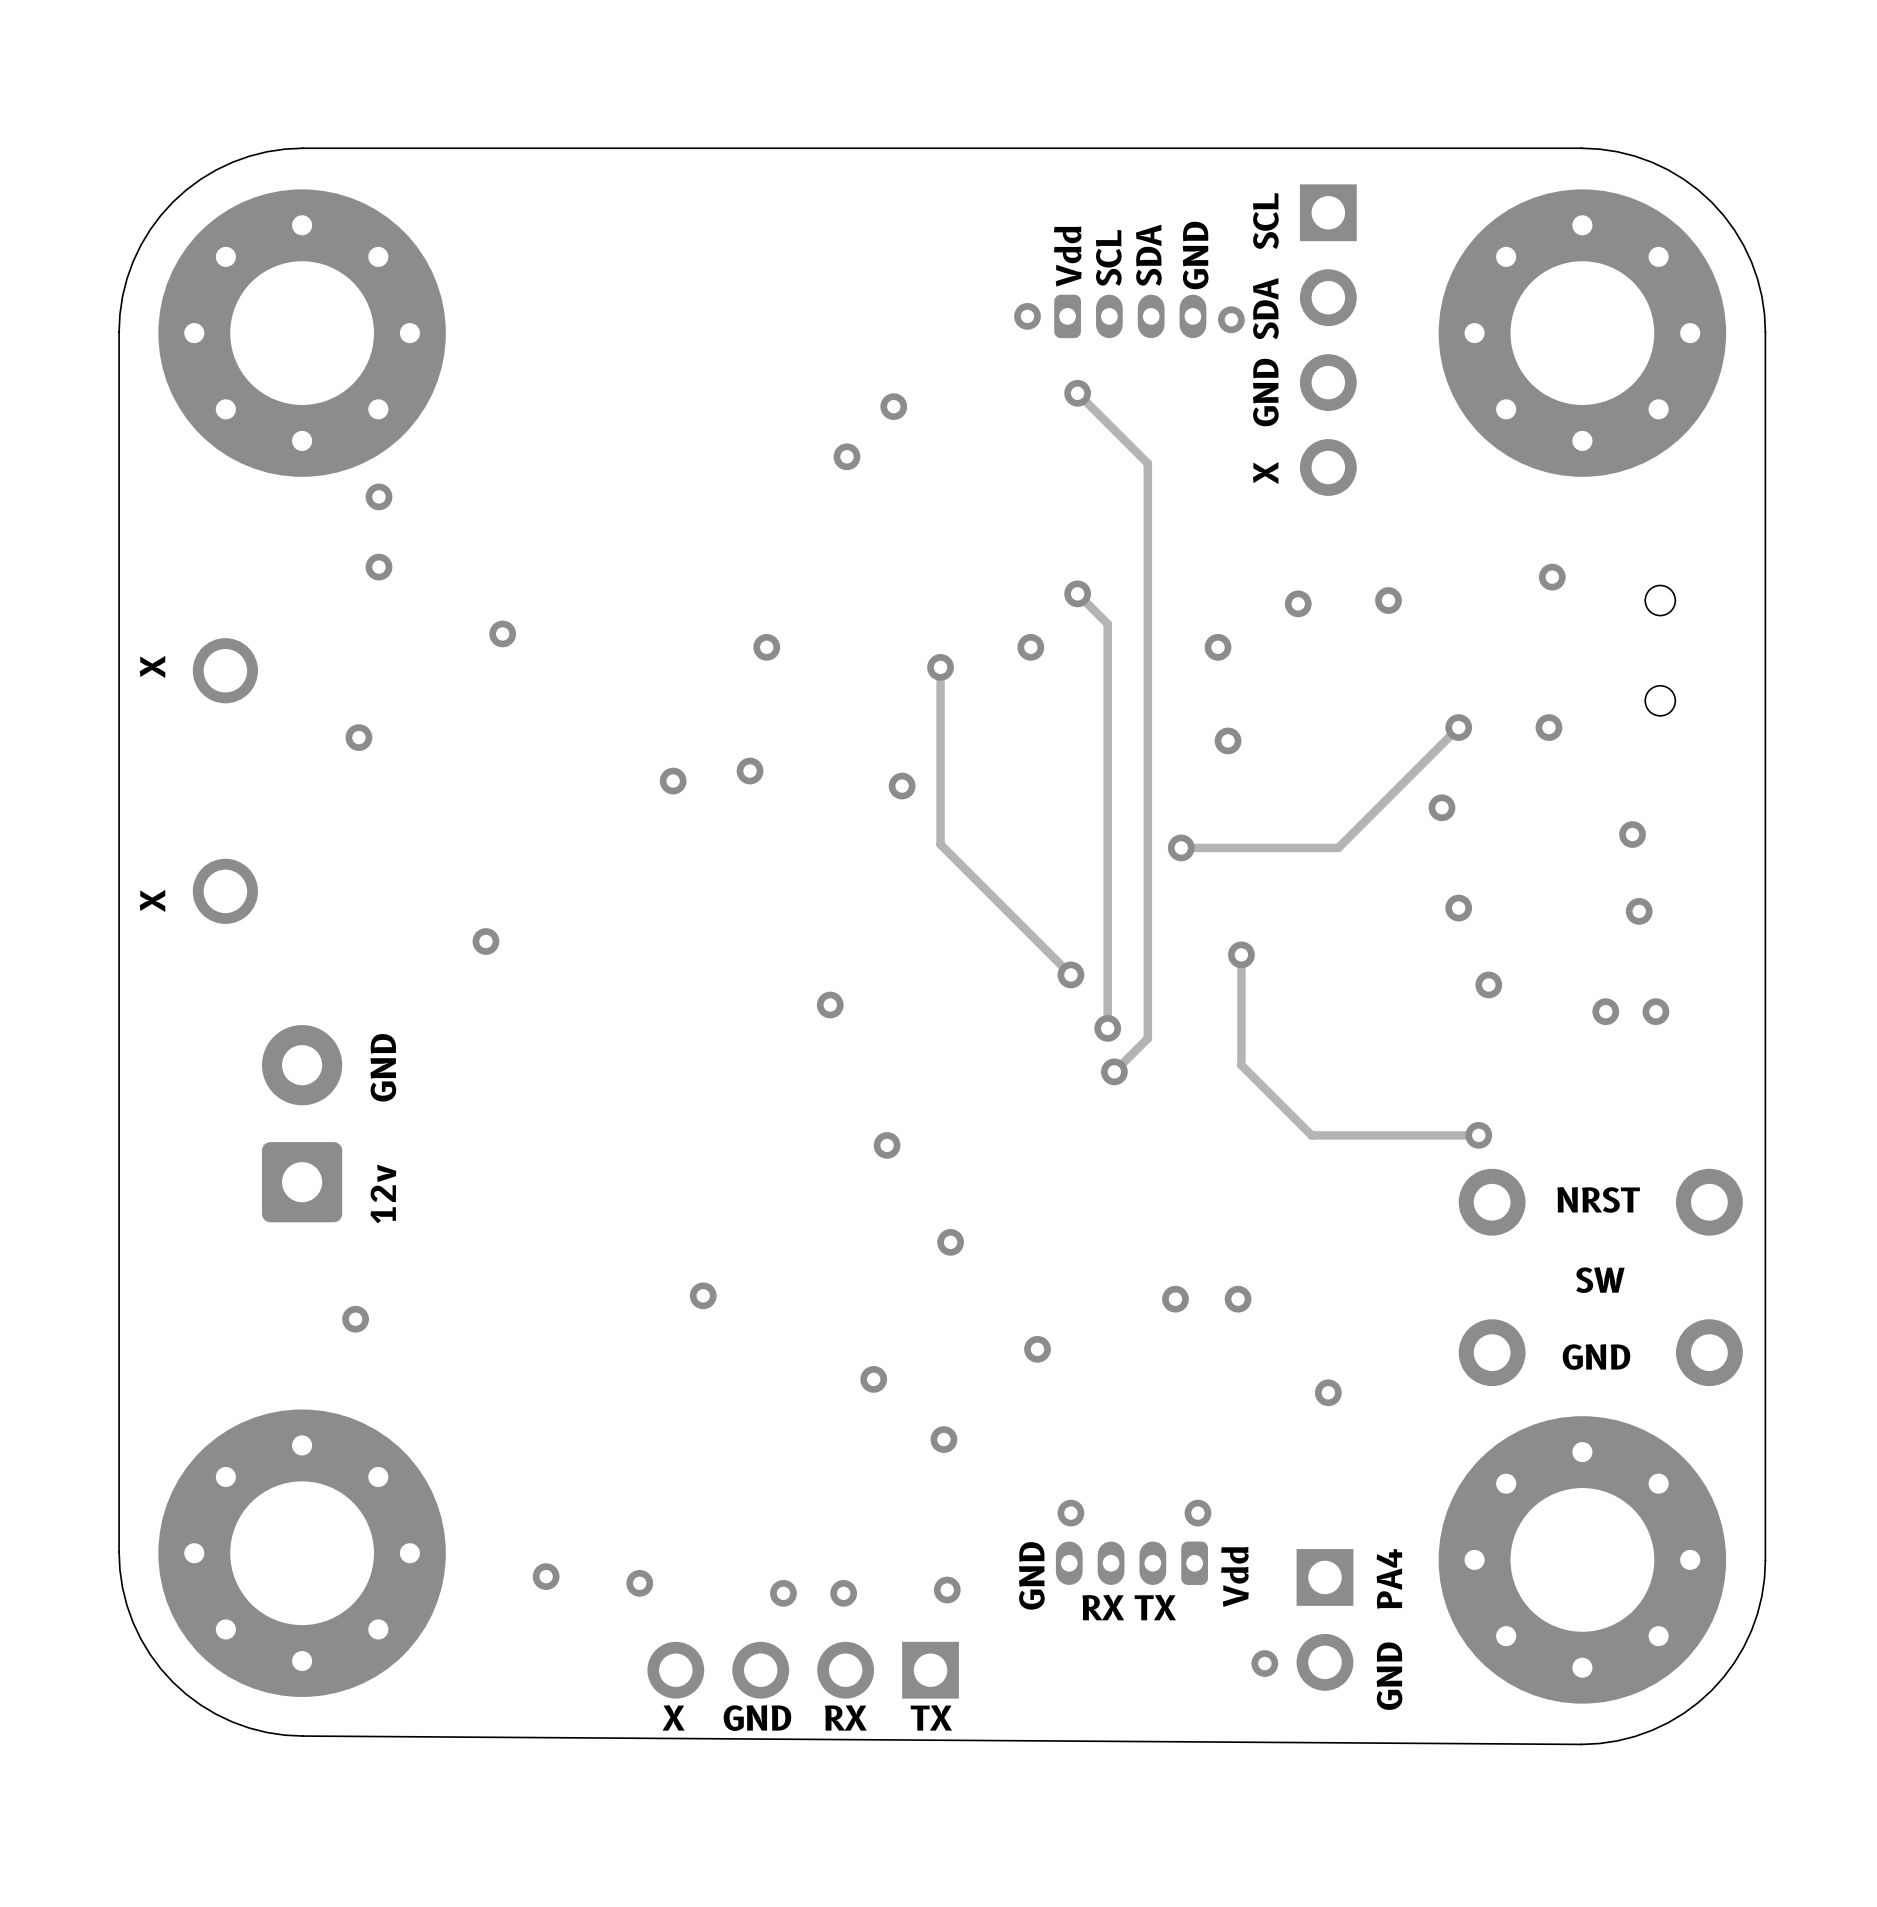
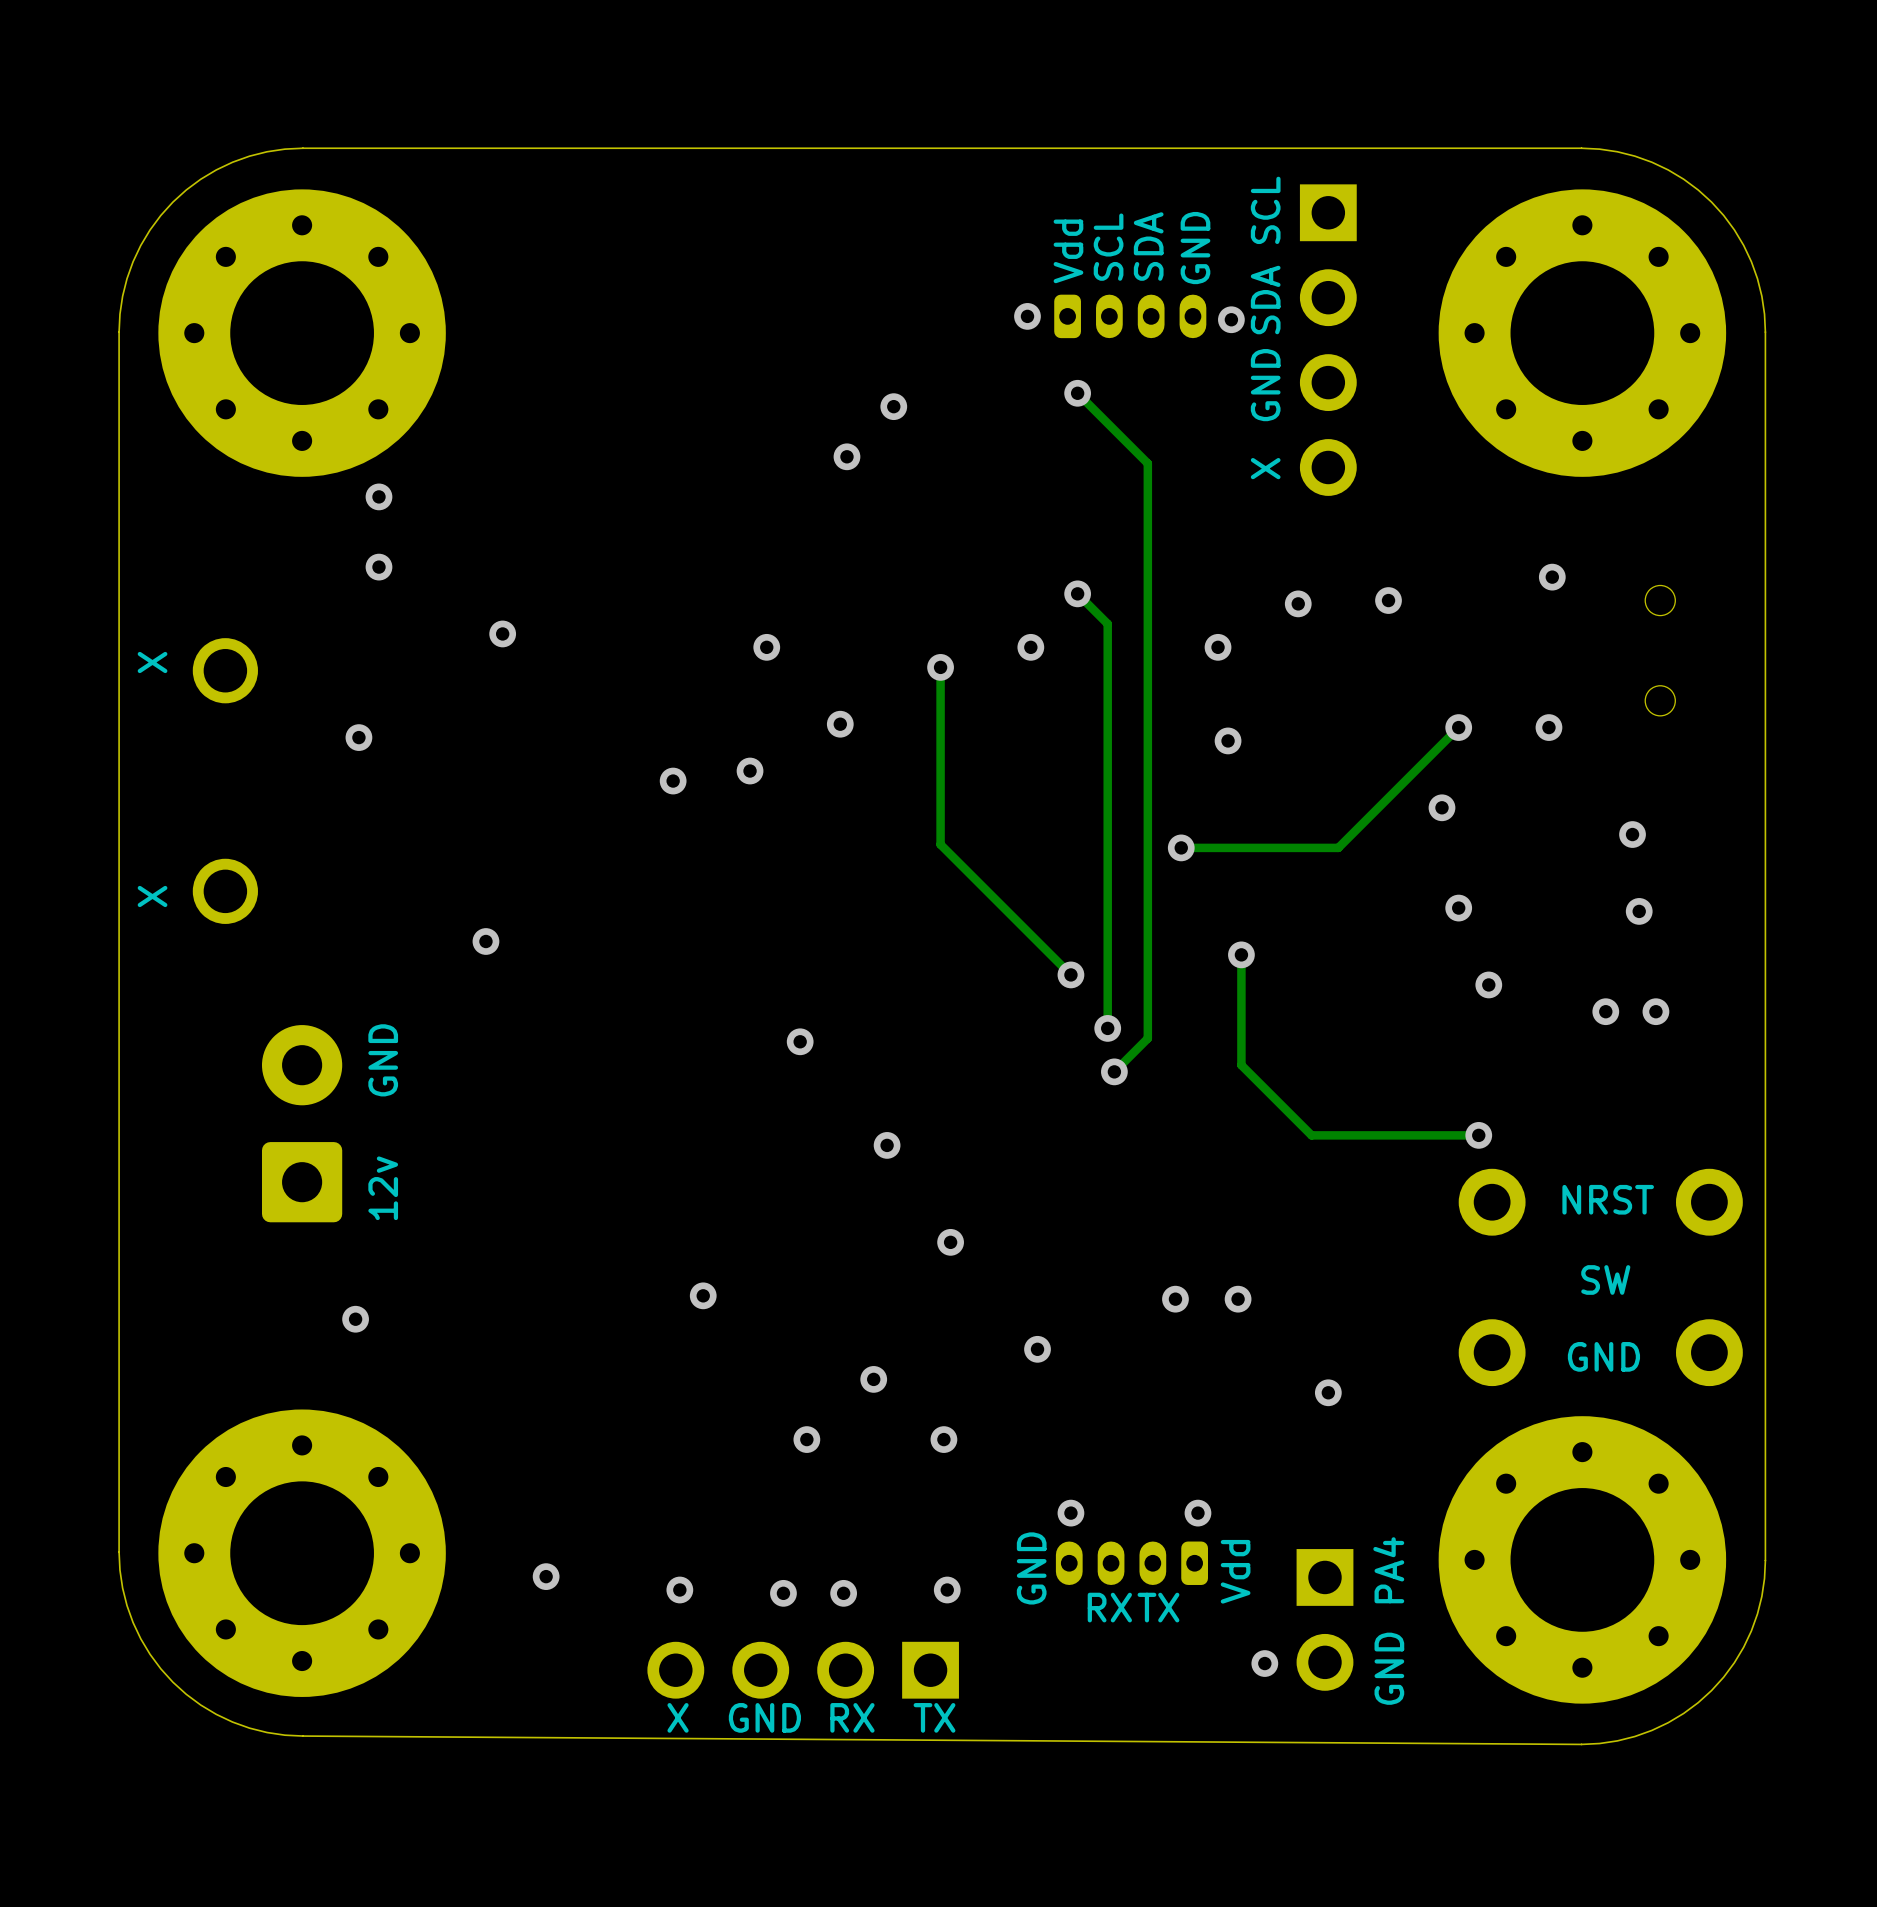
via position: (902, 786) -> (840, 724)
via position: (830, 1005) -> (800, 1041)
via: none -> (806, 1439)
via position: (639, 1583) -> (679, 1590)

